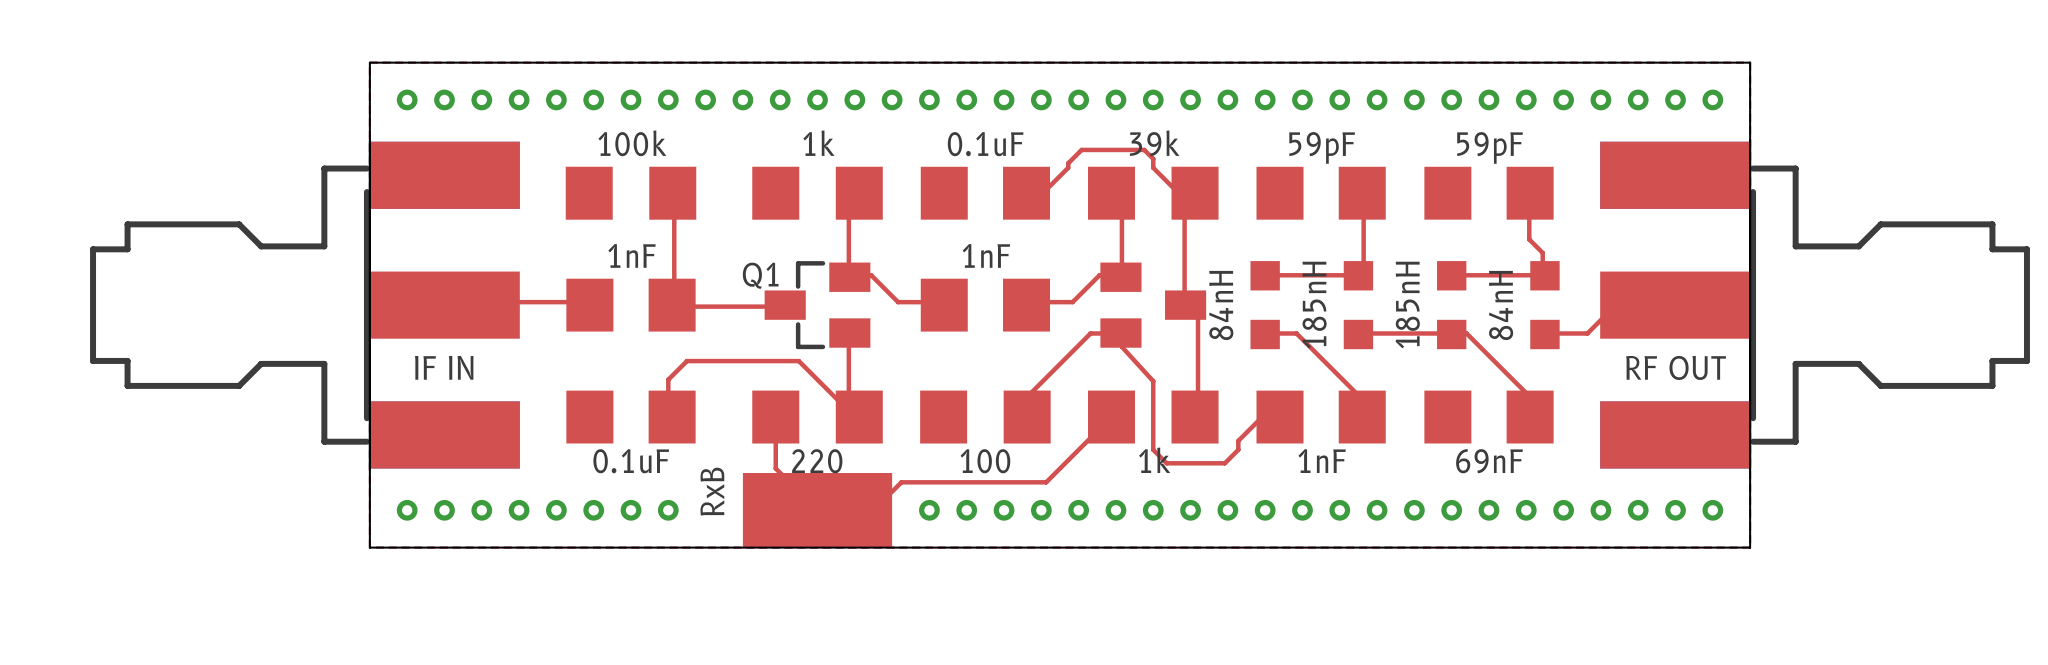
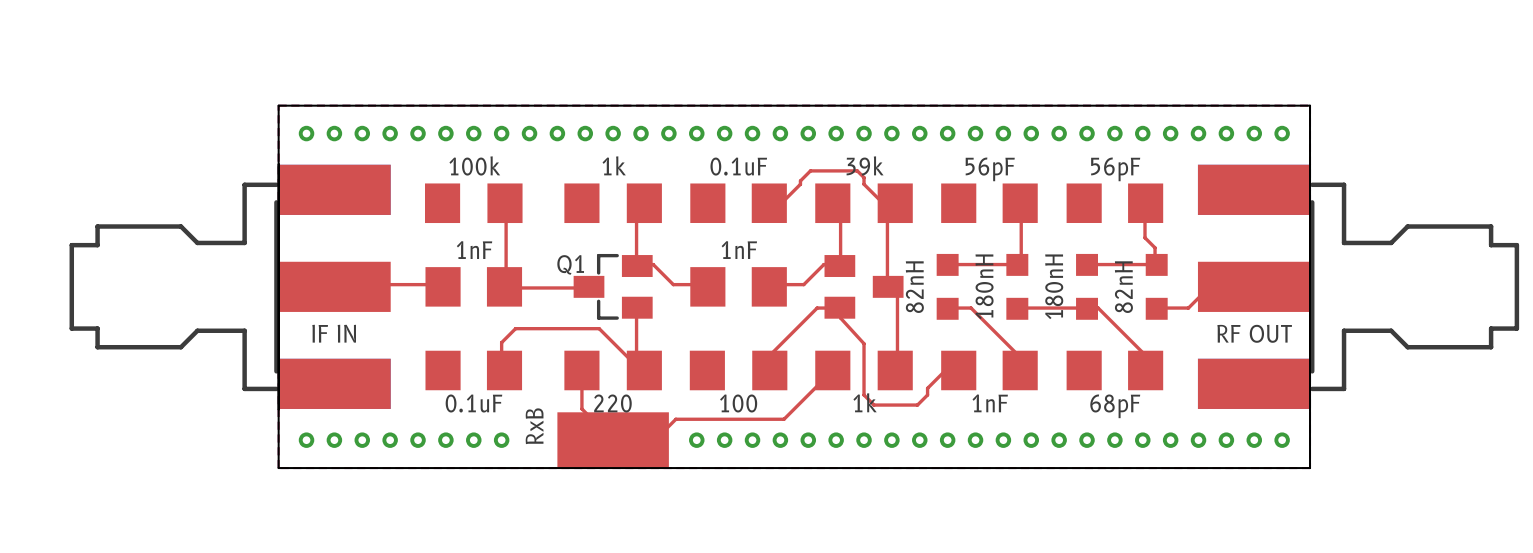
text: 59pF (1322, 147) -> 56pF (990, 169)
text: 59pF (1490, 147) -> 56pF (1115, 169)
text: 84nH (1221, 305) -> 82nH (914, 287)
text: 185nH (1314, 305) -> 180nH (984, 286)
text: 185nH (1407, 305) -> 180nH (1054, 286)
text: 84nH (1501, 305) -> 82nH (1123, 287)
text: 69nF (1489, 461) -> 68pF (1115, 406)

